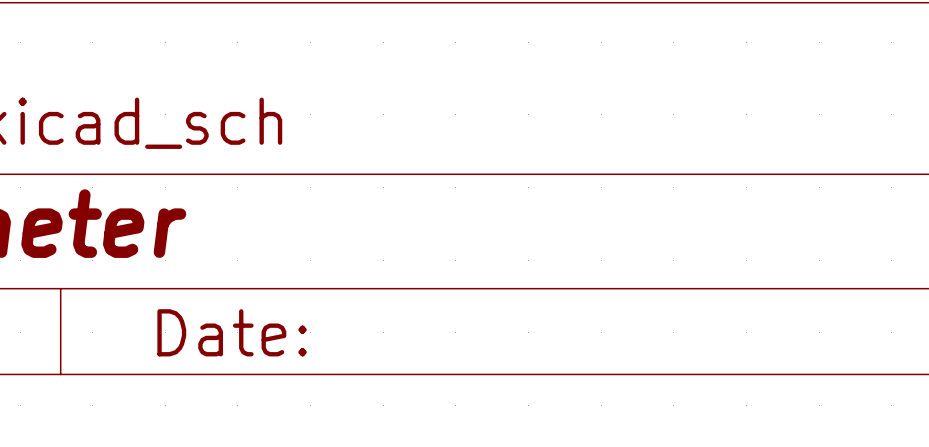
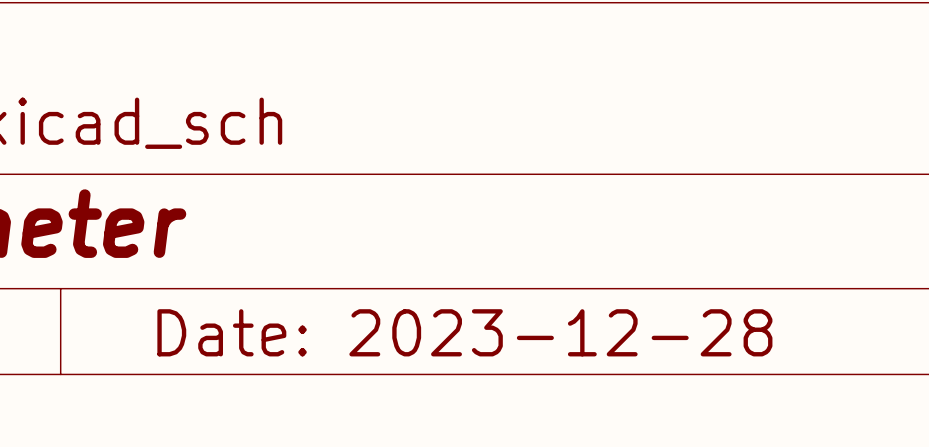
title block: Date: (232, 332) -> Date: 2023-12-28 (464, 332)

